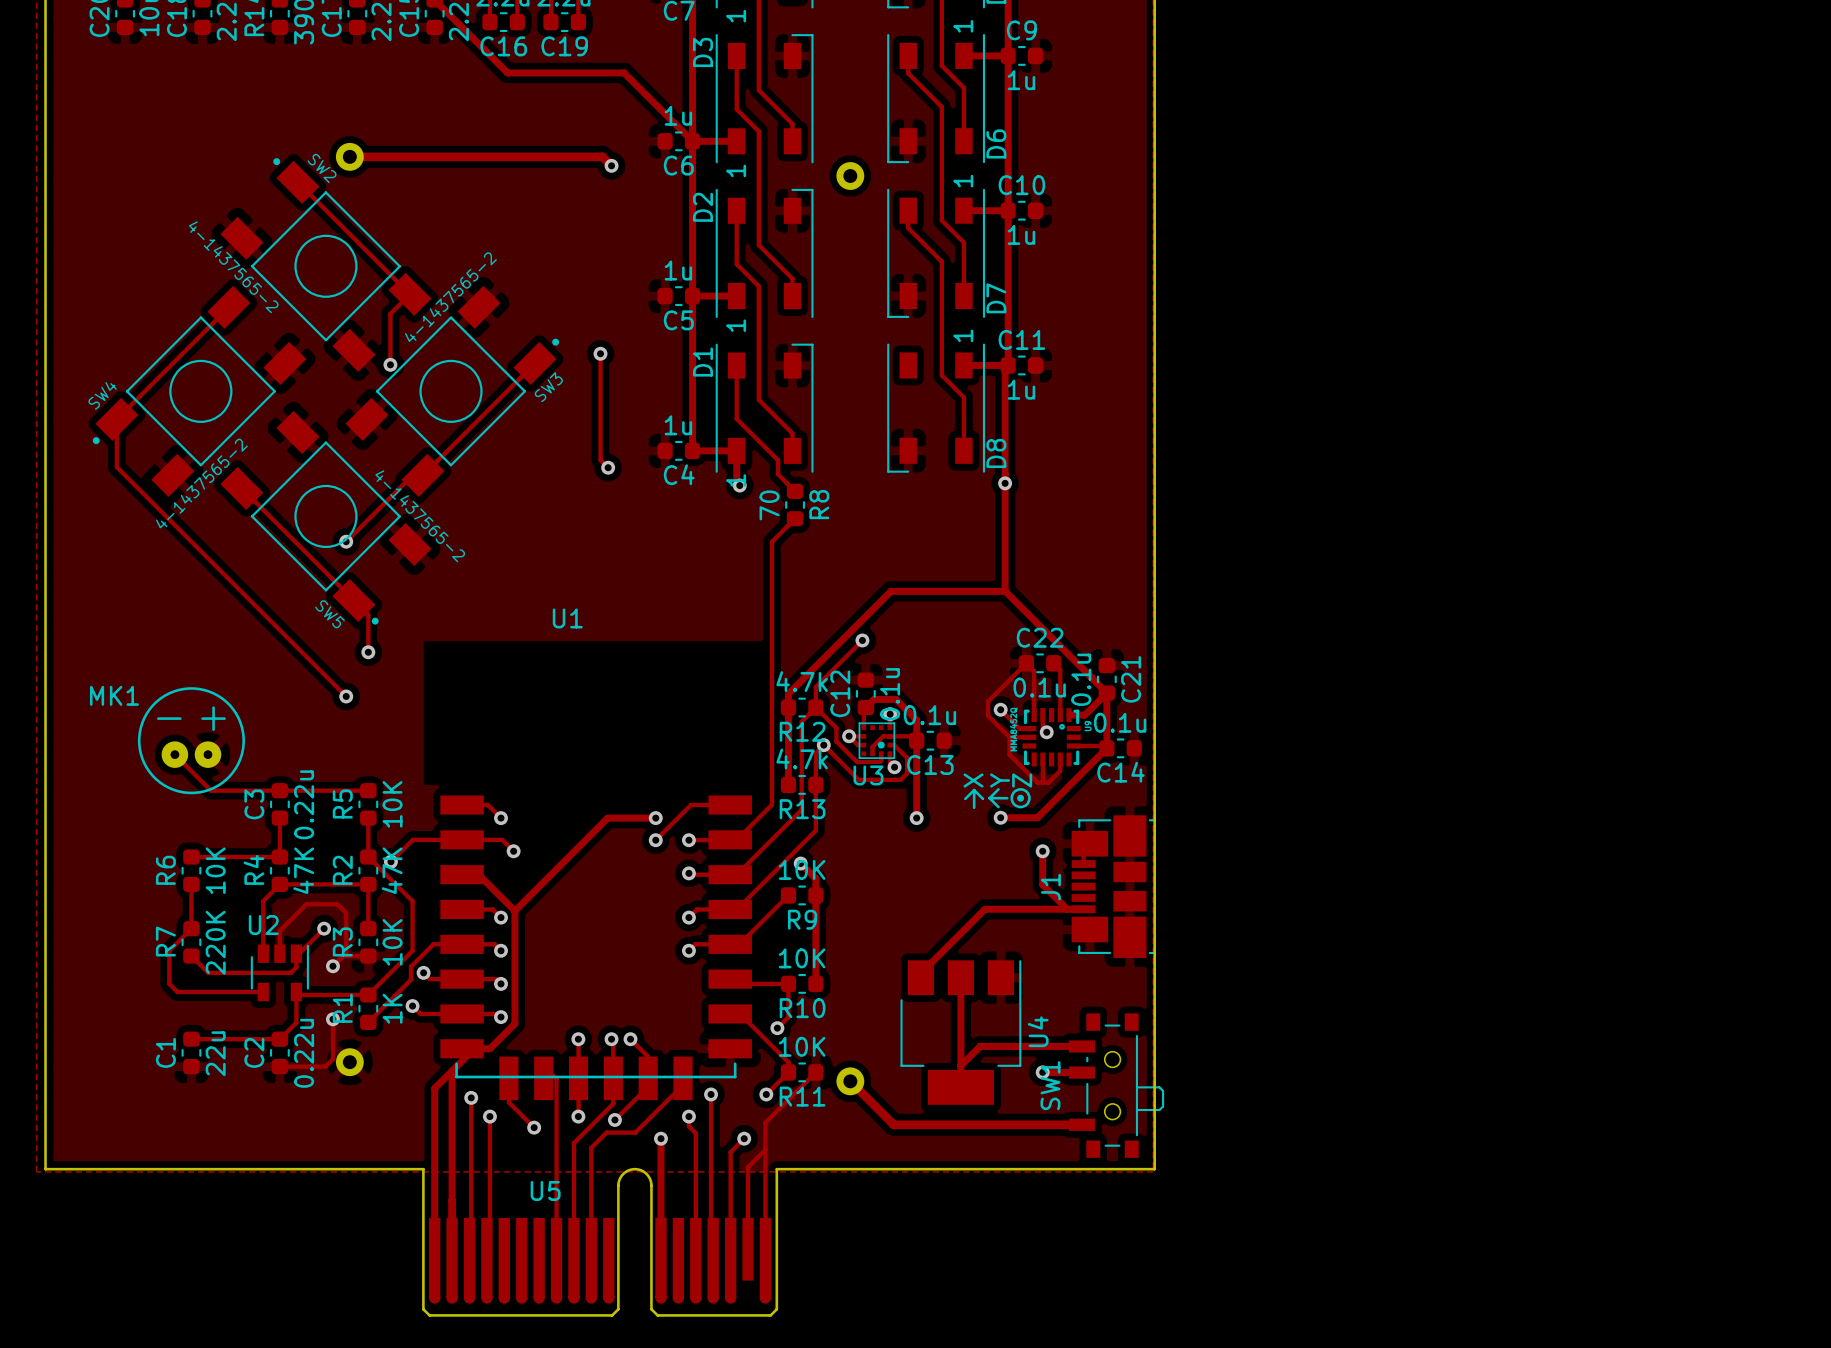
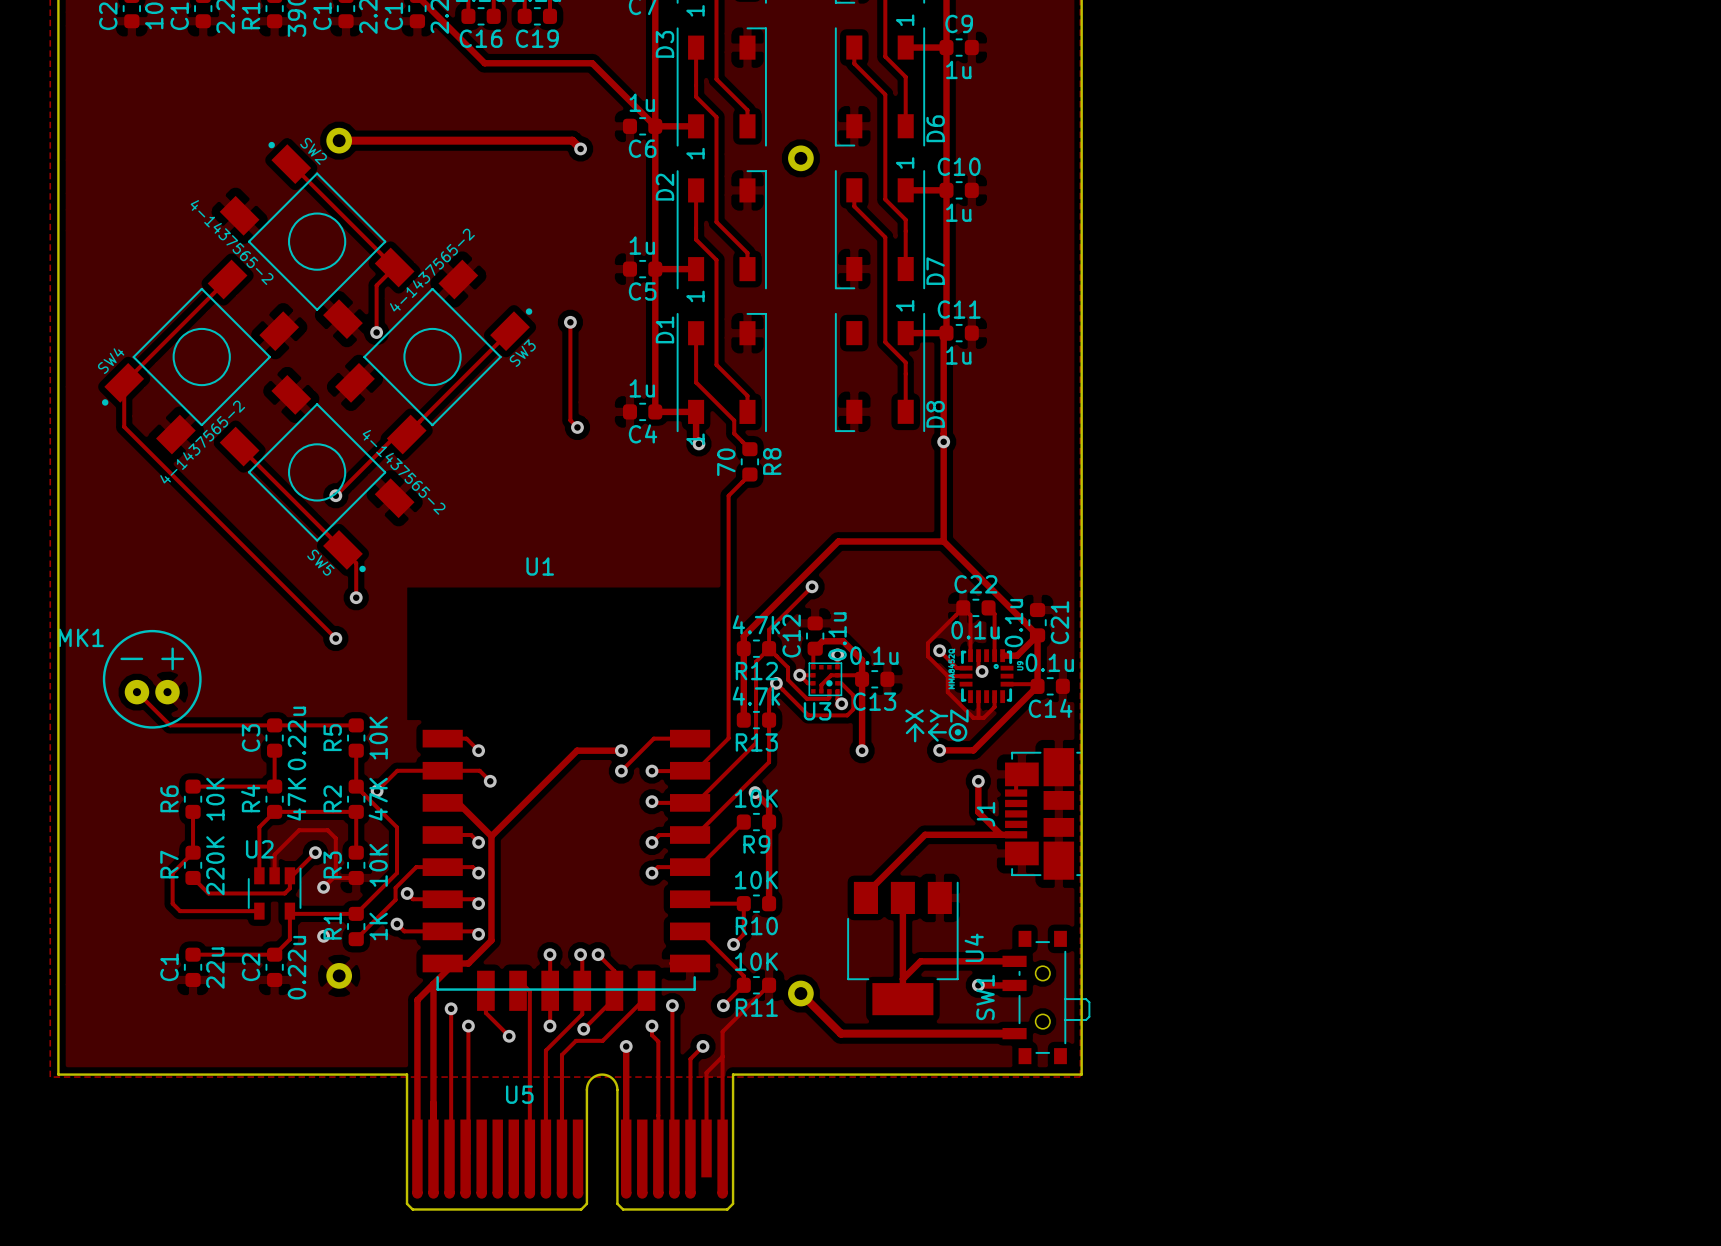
MK1 position: (191, 740) -> (152, 679)
track: (174, 754) (210, 790) -> (136, 692) (170, 725) (211, 725)
track: (332, 1019) (332, 1059) (325, 1066) (279, 1066) -> none

